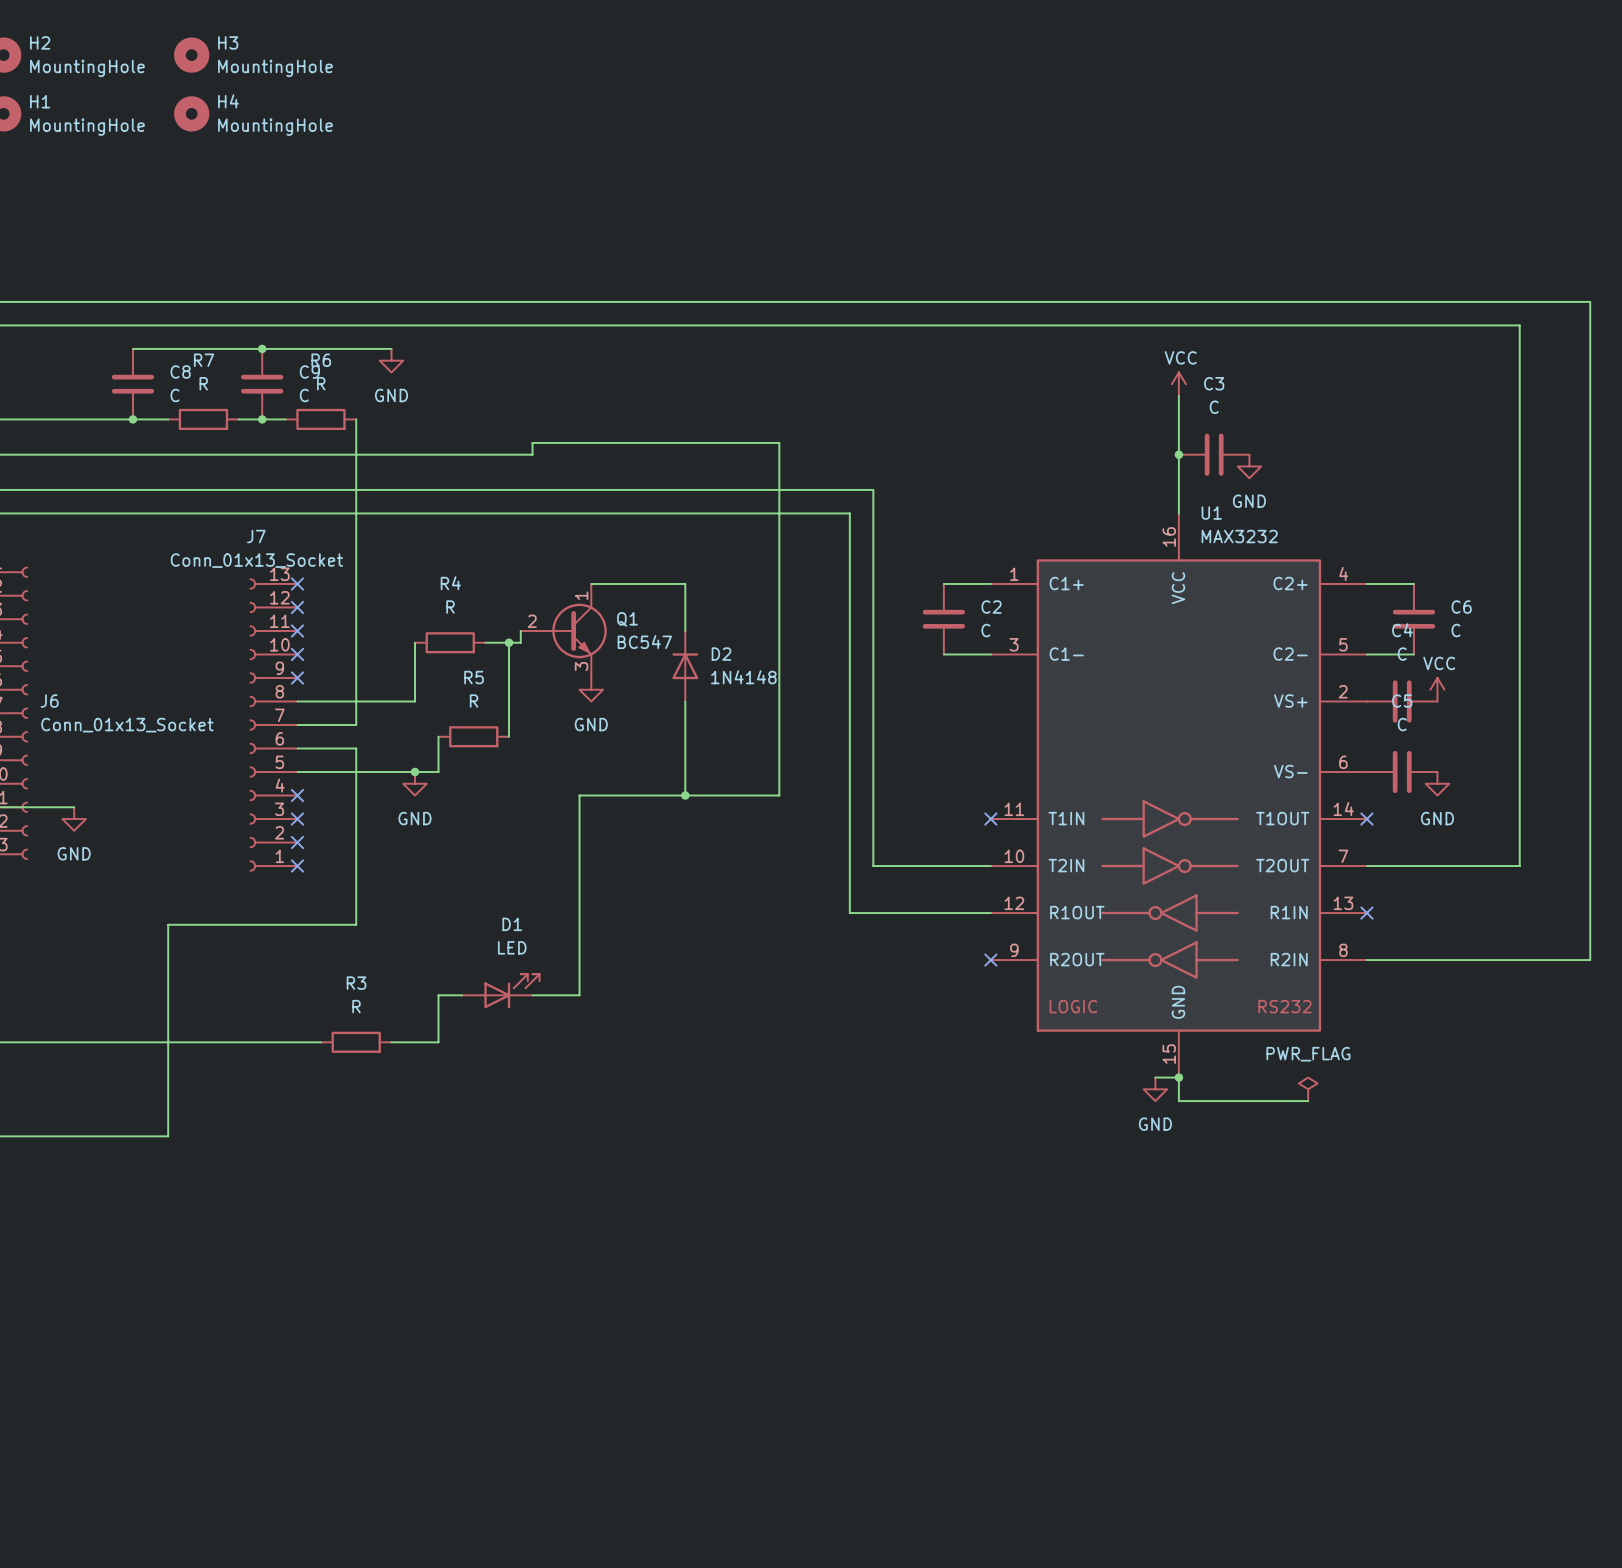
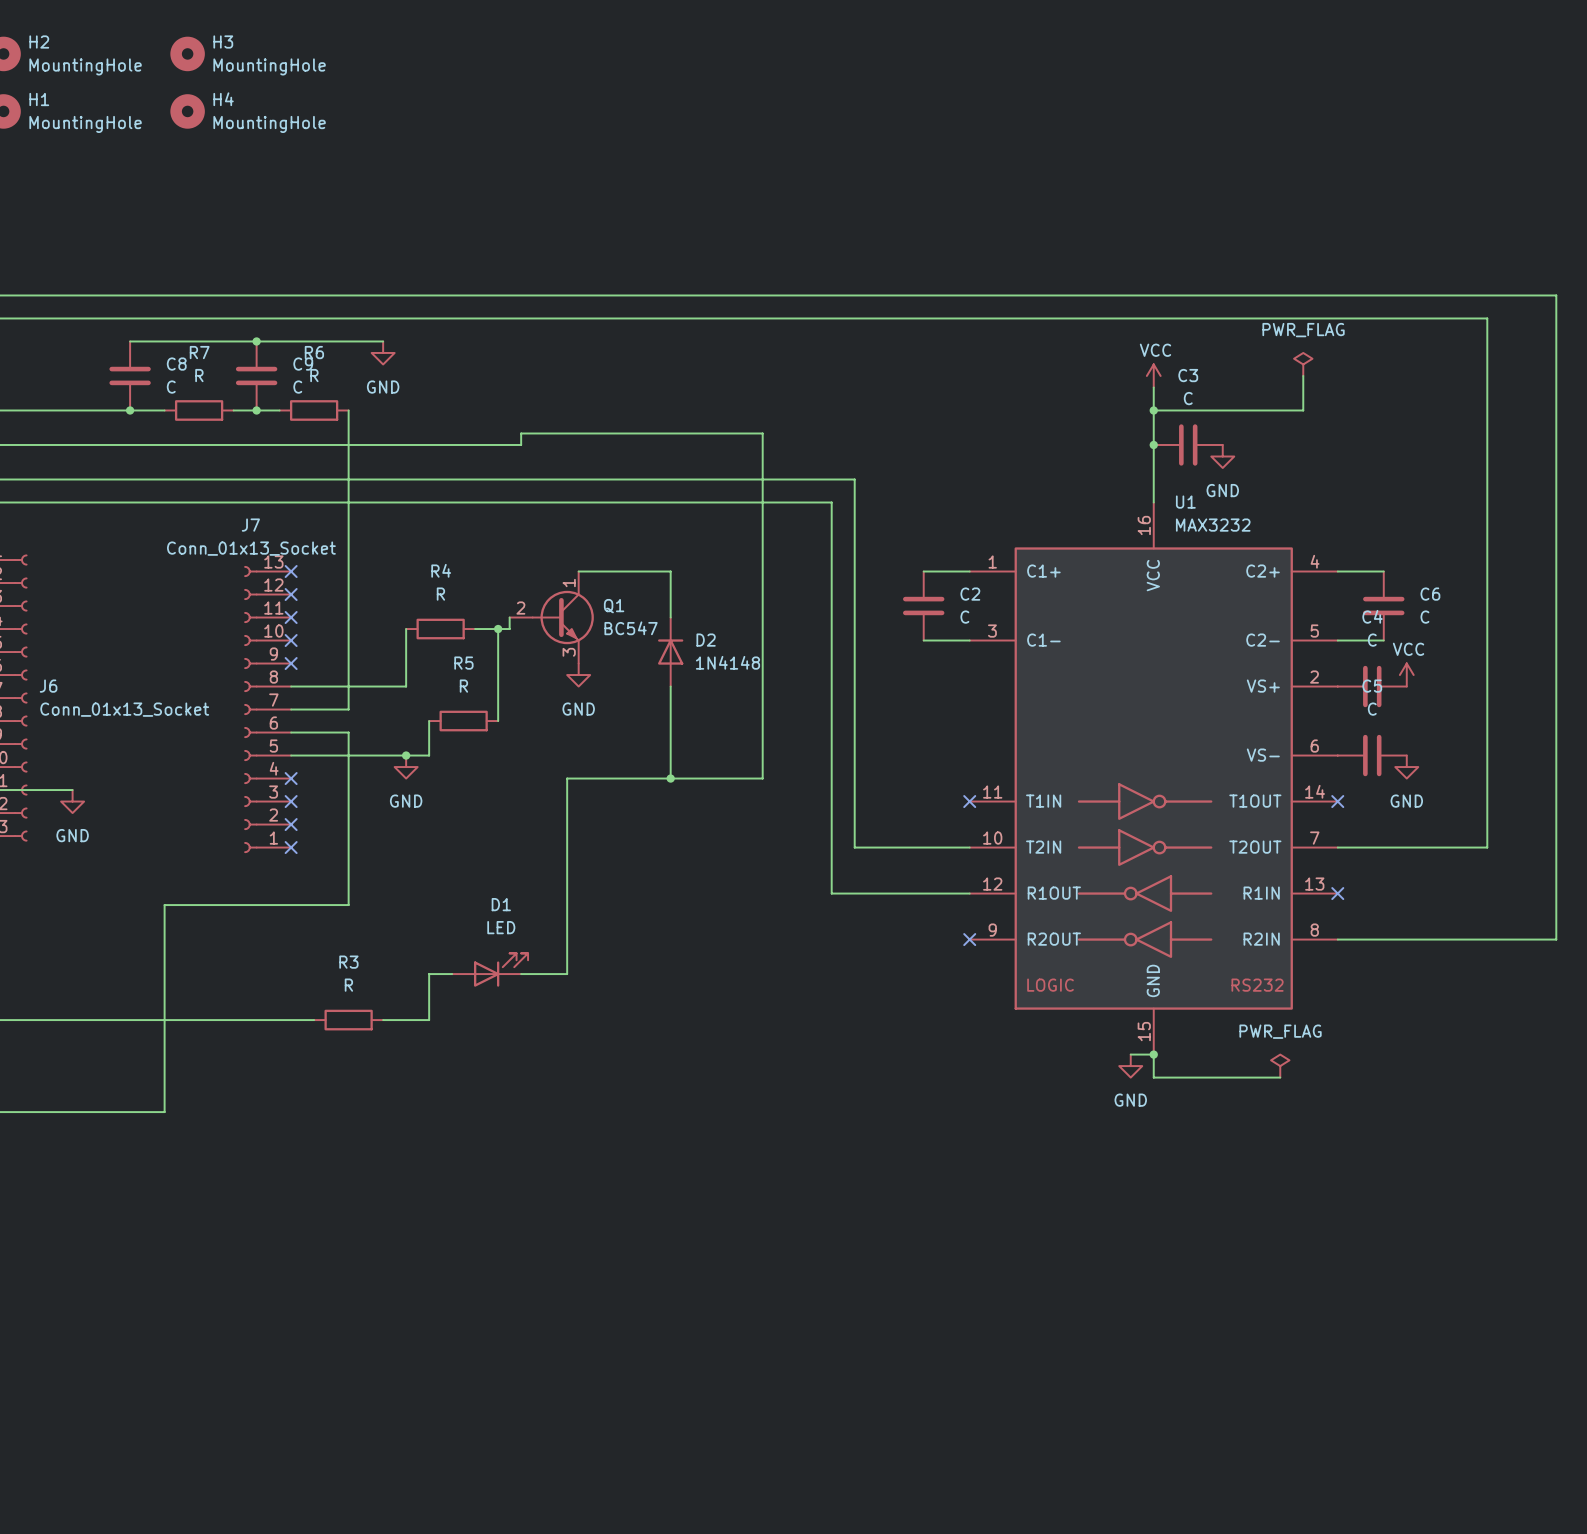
power symbol: none -> PWR_FLAG (1303, 364)
wire: none -> (1303, 375) (1303, 410) (1153, 410)
junction: none -> (1153, 410)

